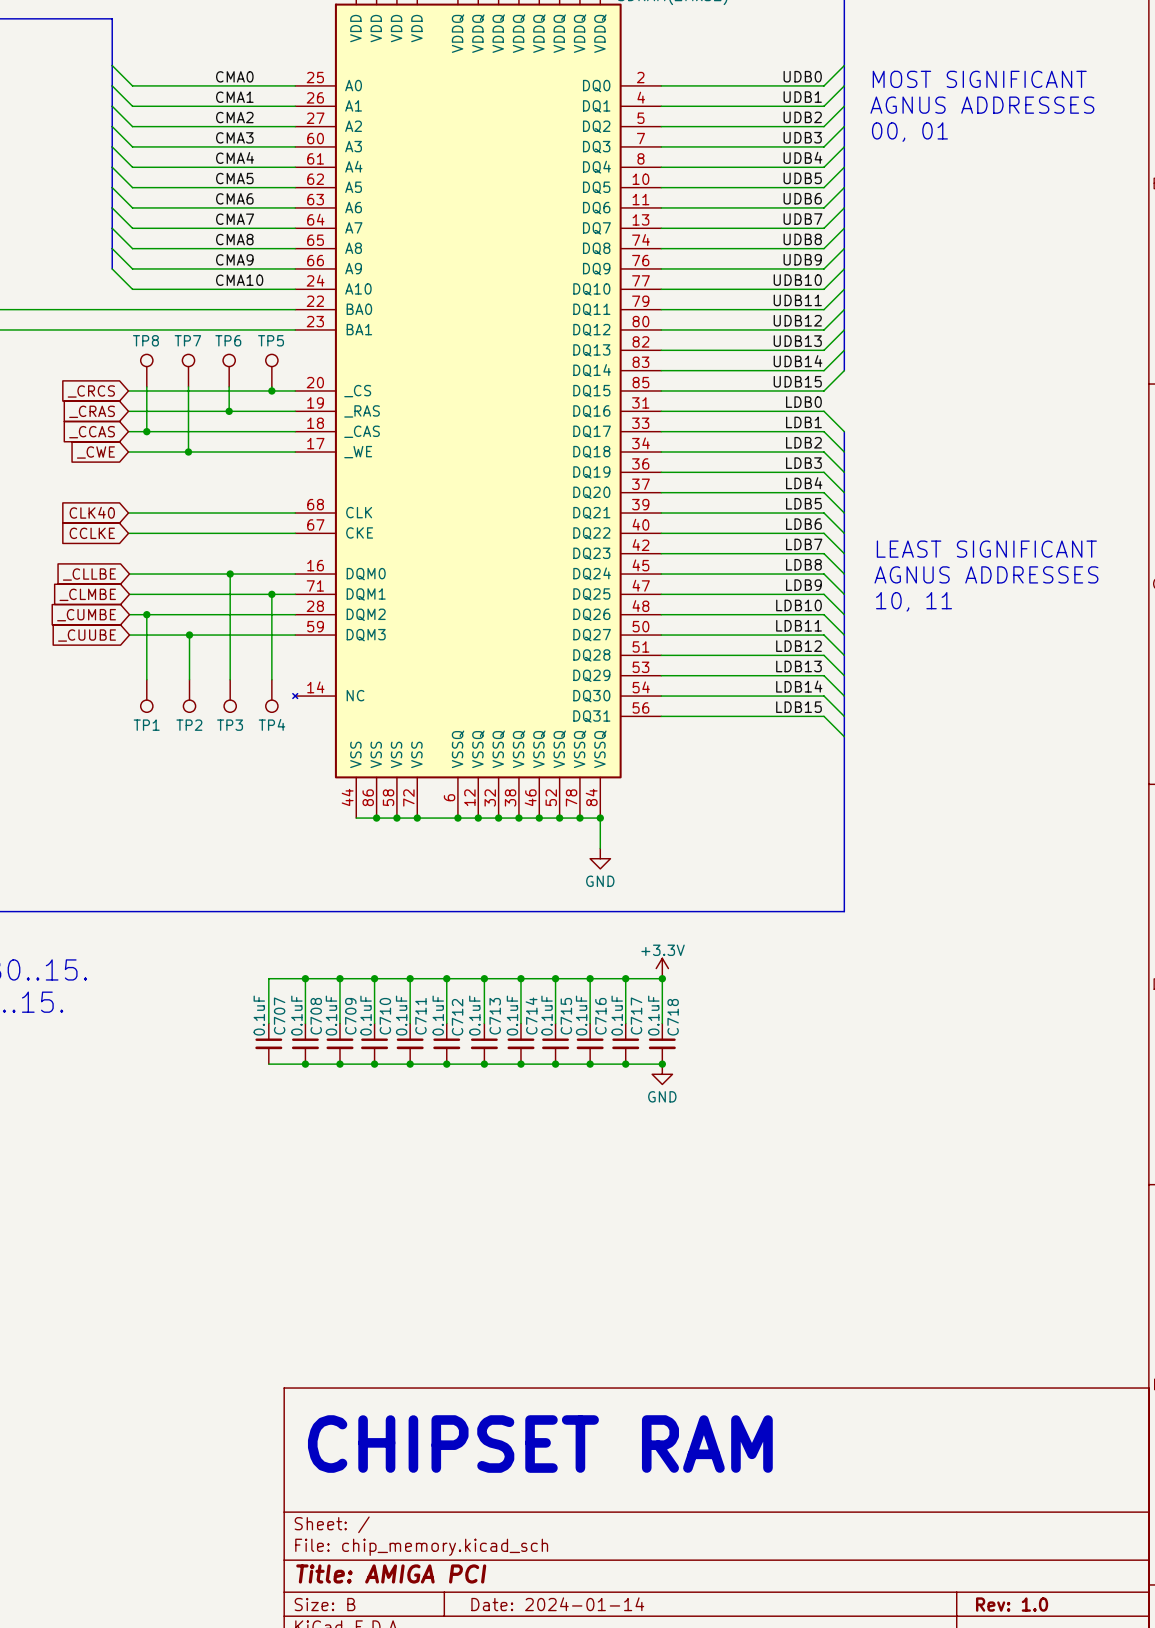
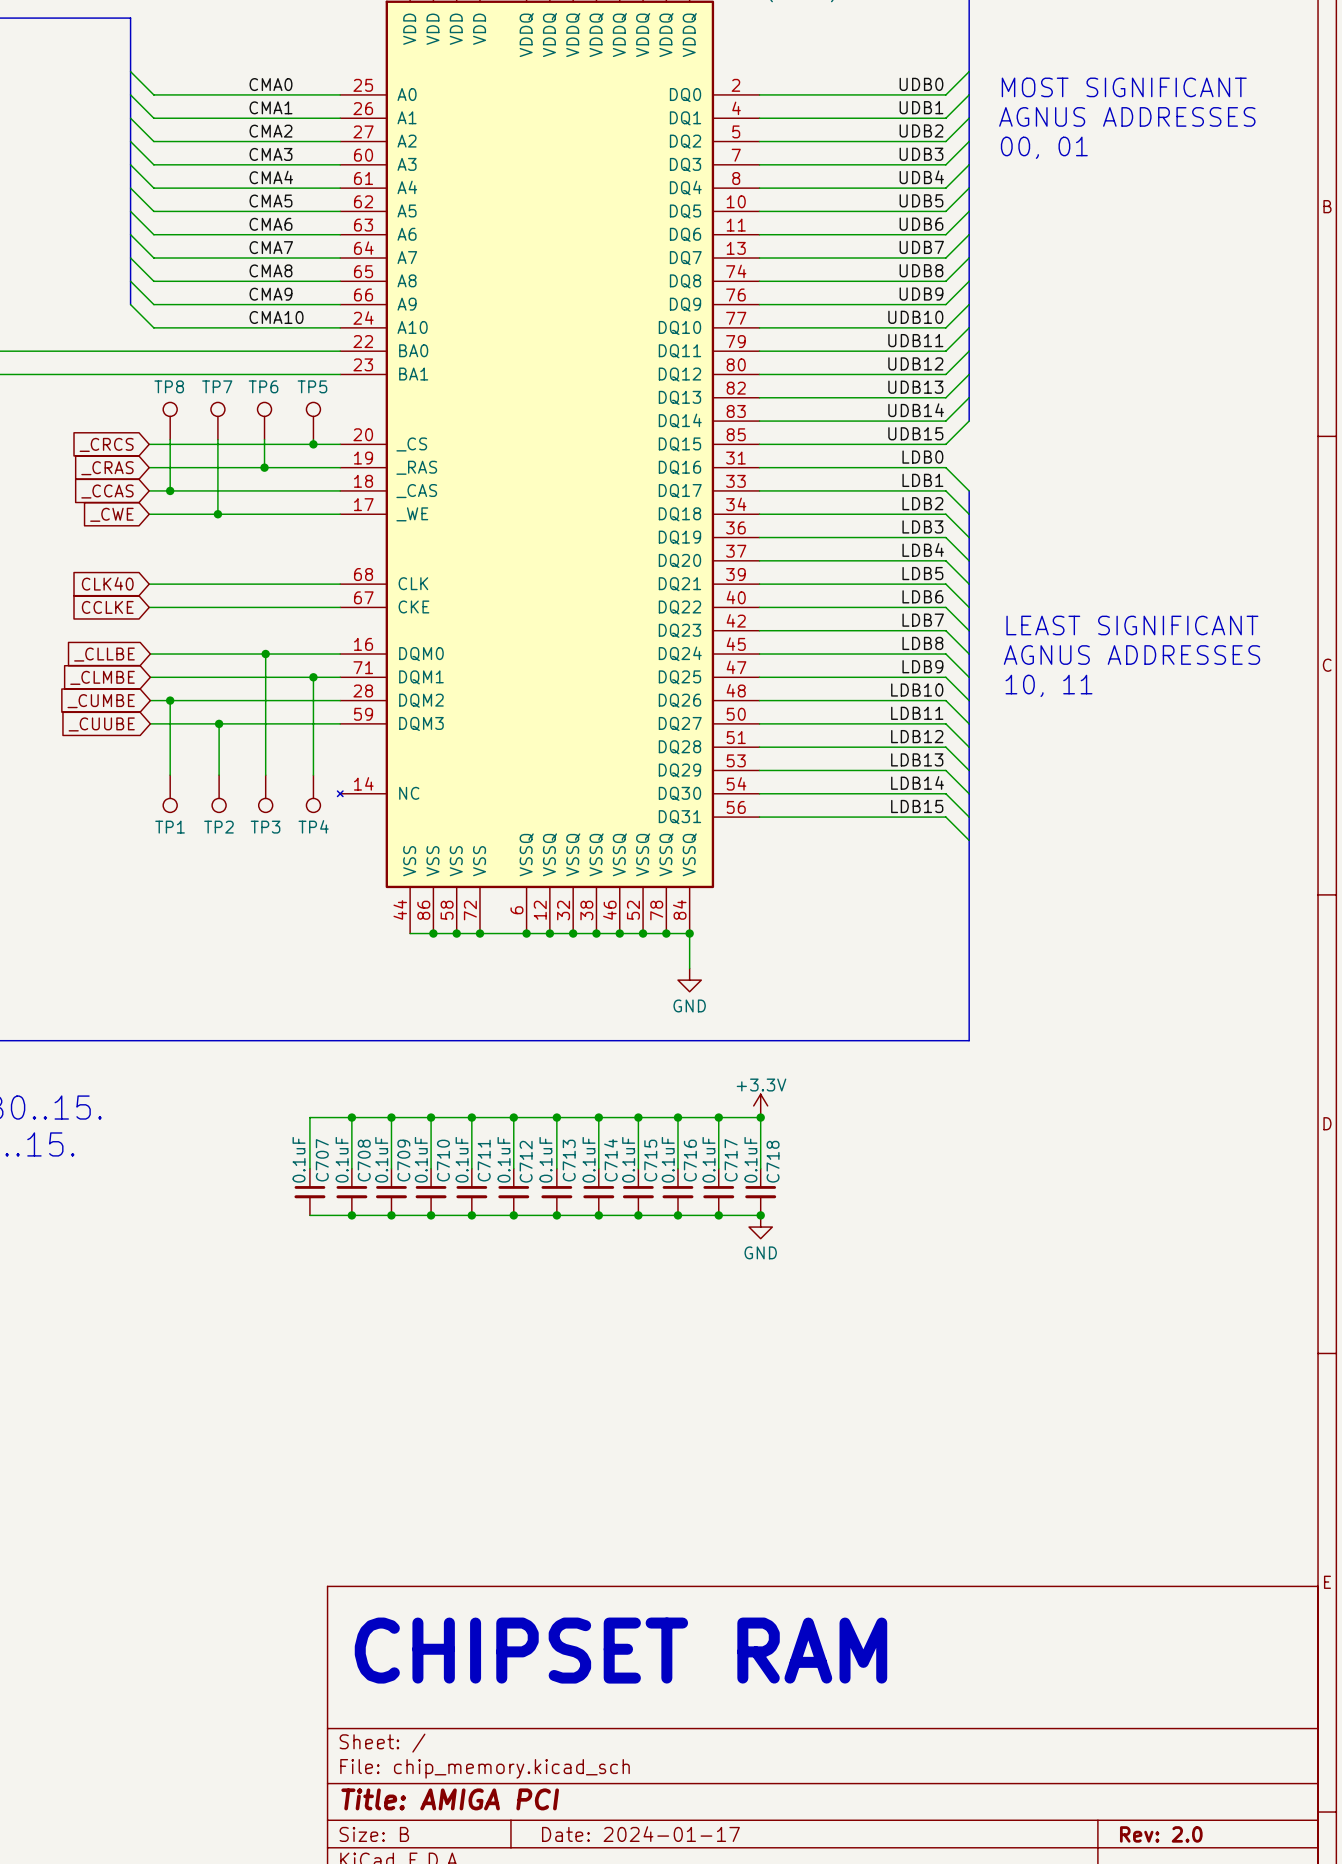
title block: Date: 2024-01-14 (557, 1604) -> Date: 2024-01-17 (640, 1834)
title block: Rev: 1.0 (1012, 1604) -> Rev: 2.0 (1161, 1834)

